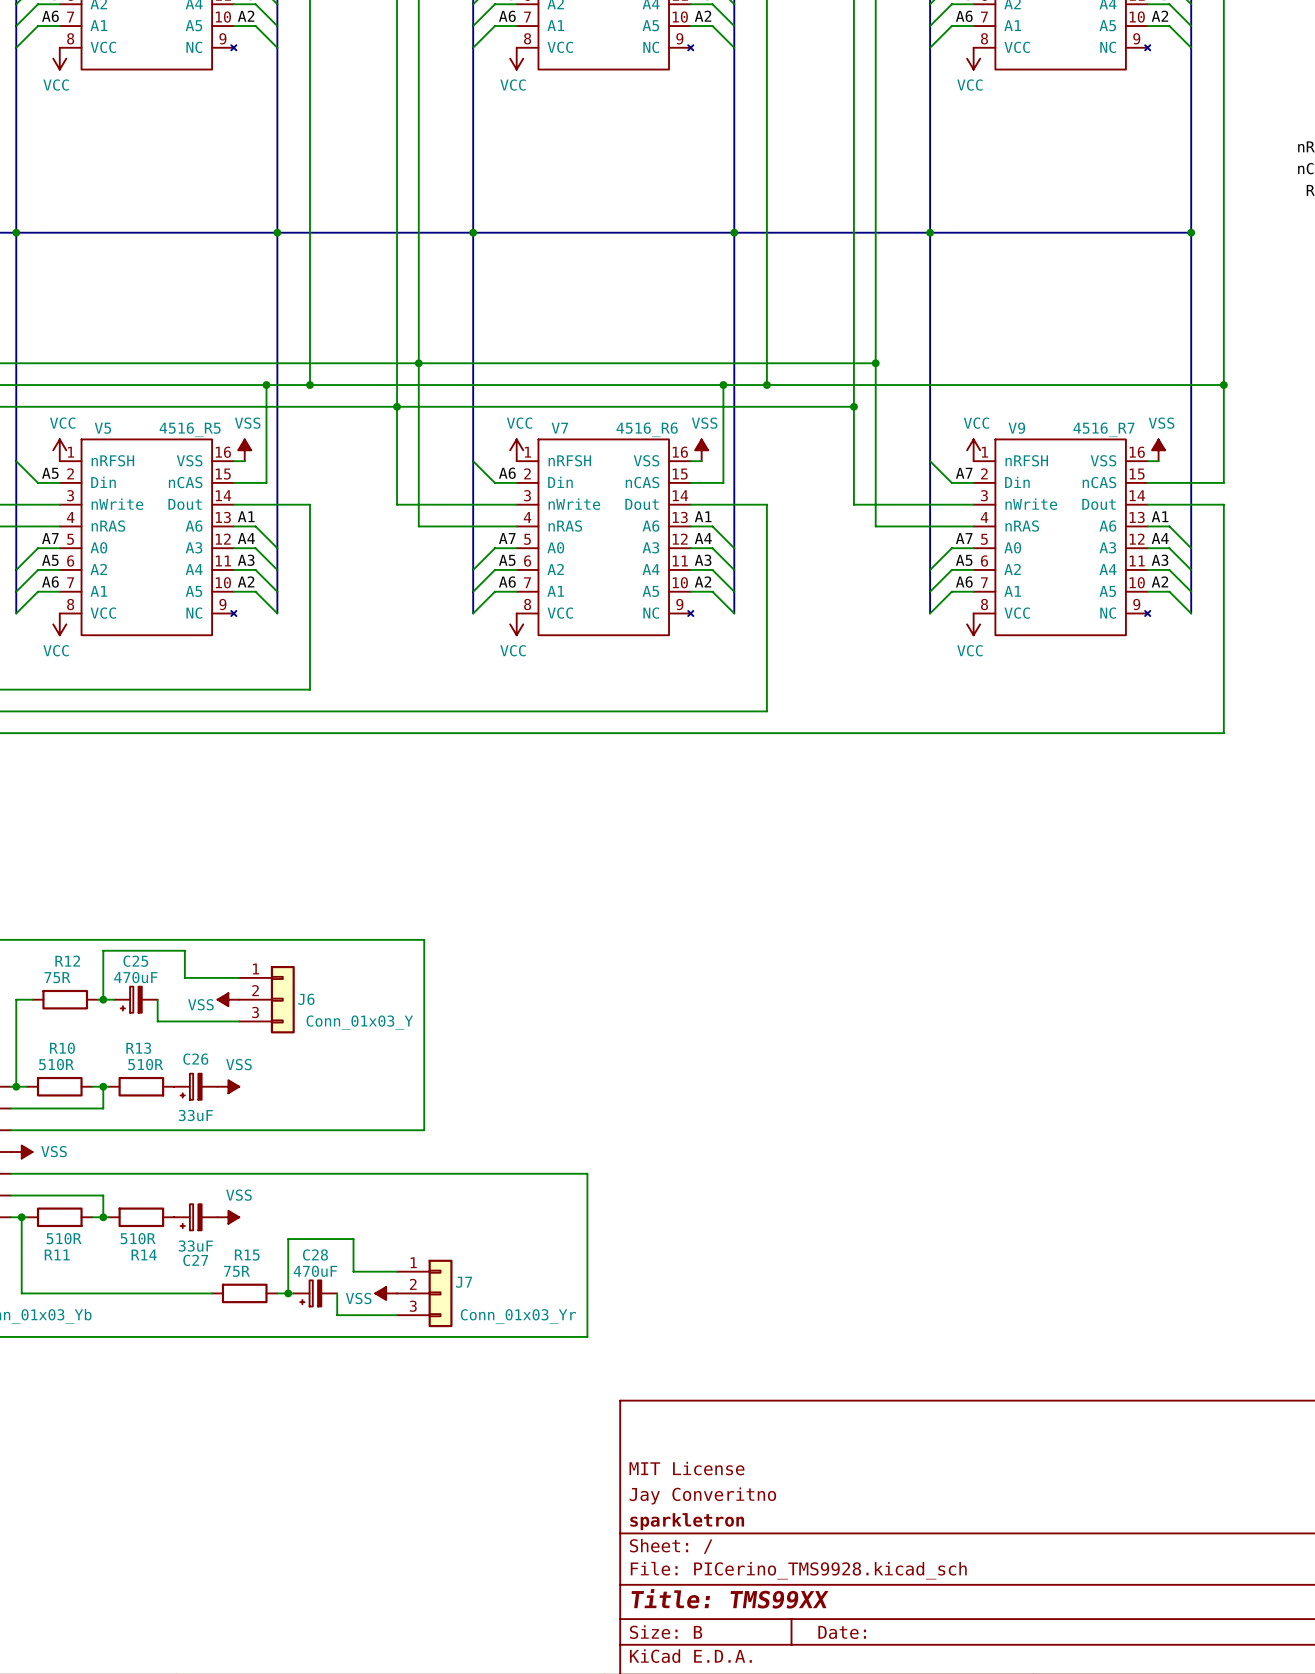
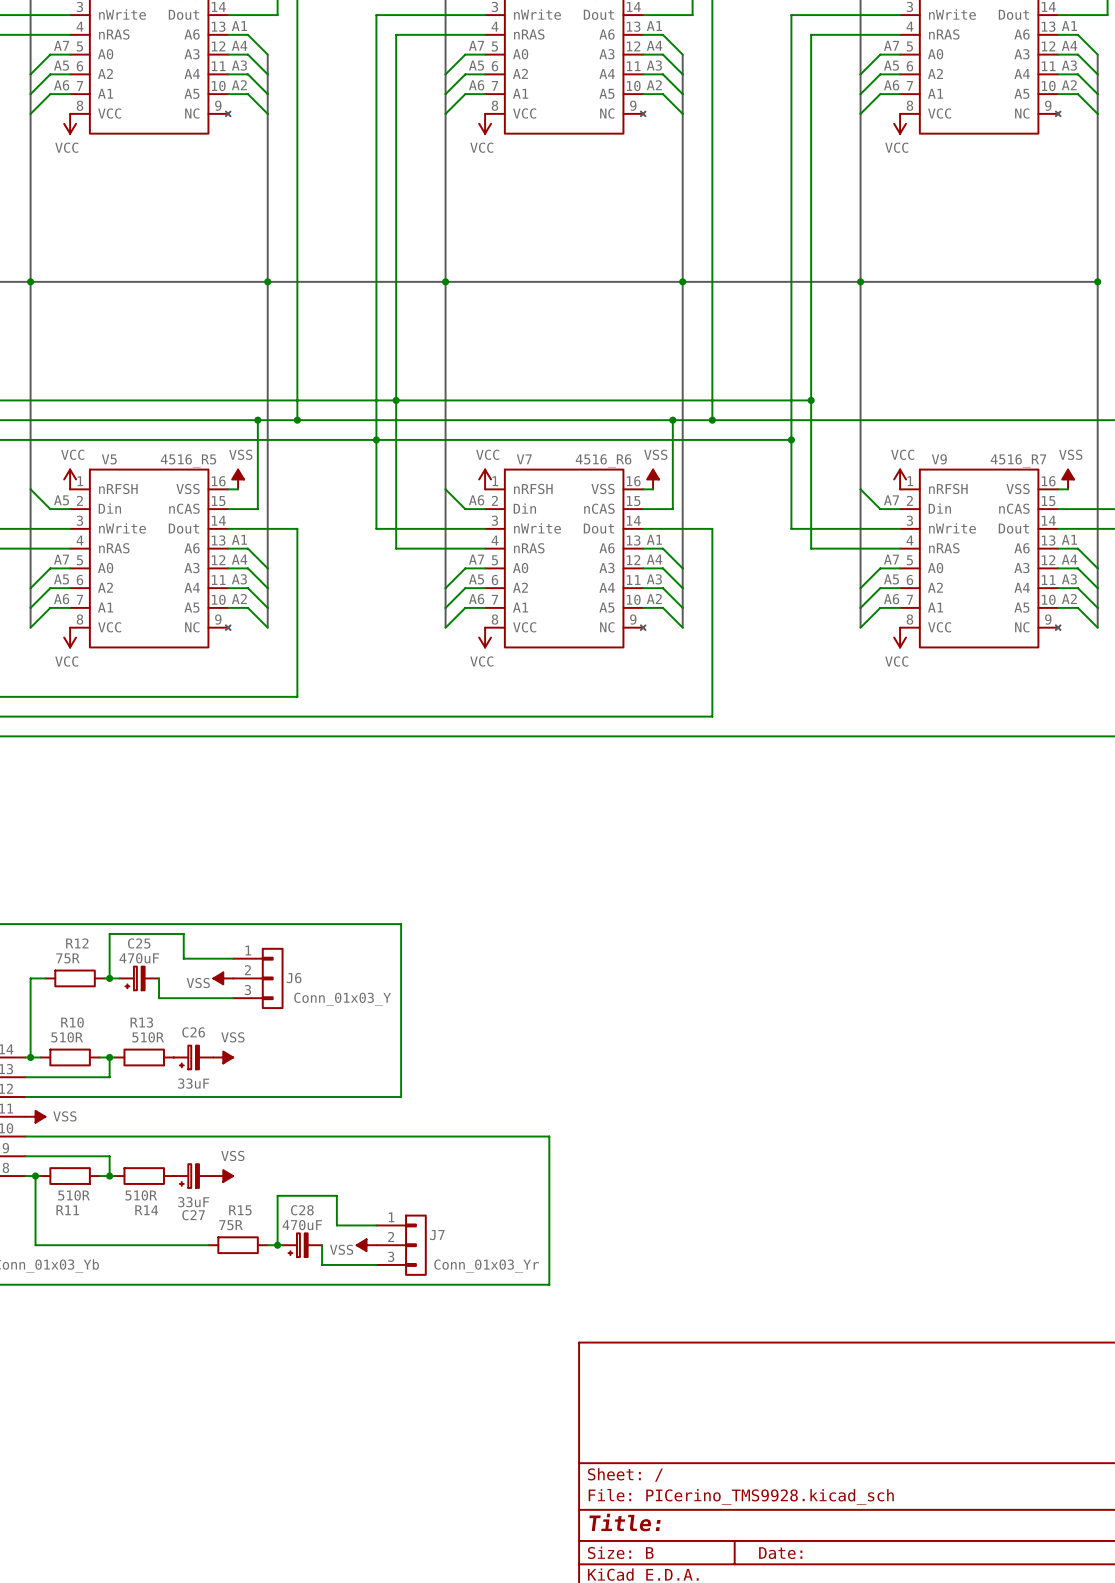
title block: MIT License (686, 1468) -> none
title block: Jay Converitno (702, 1495) -> none
title block: sparkletron (687, 1521) -> none
title block: Title: TMS99XX (730, 1598) -> Title: (625, 1522)

